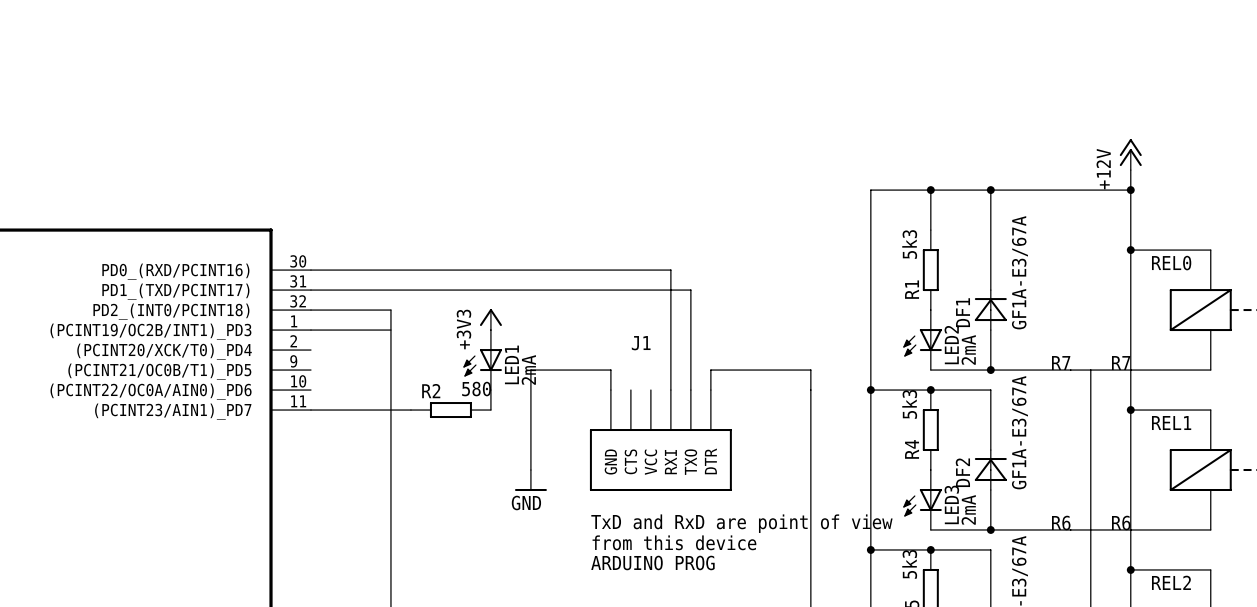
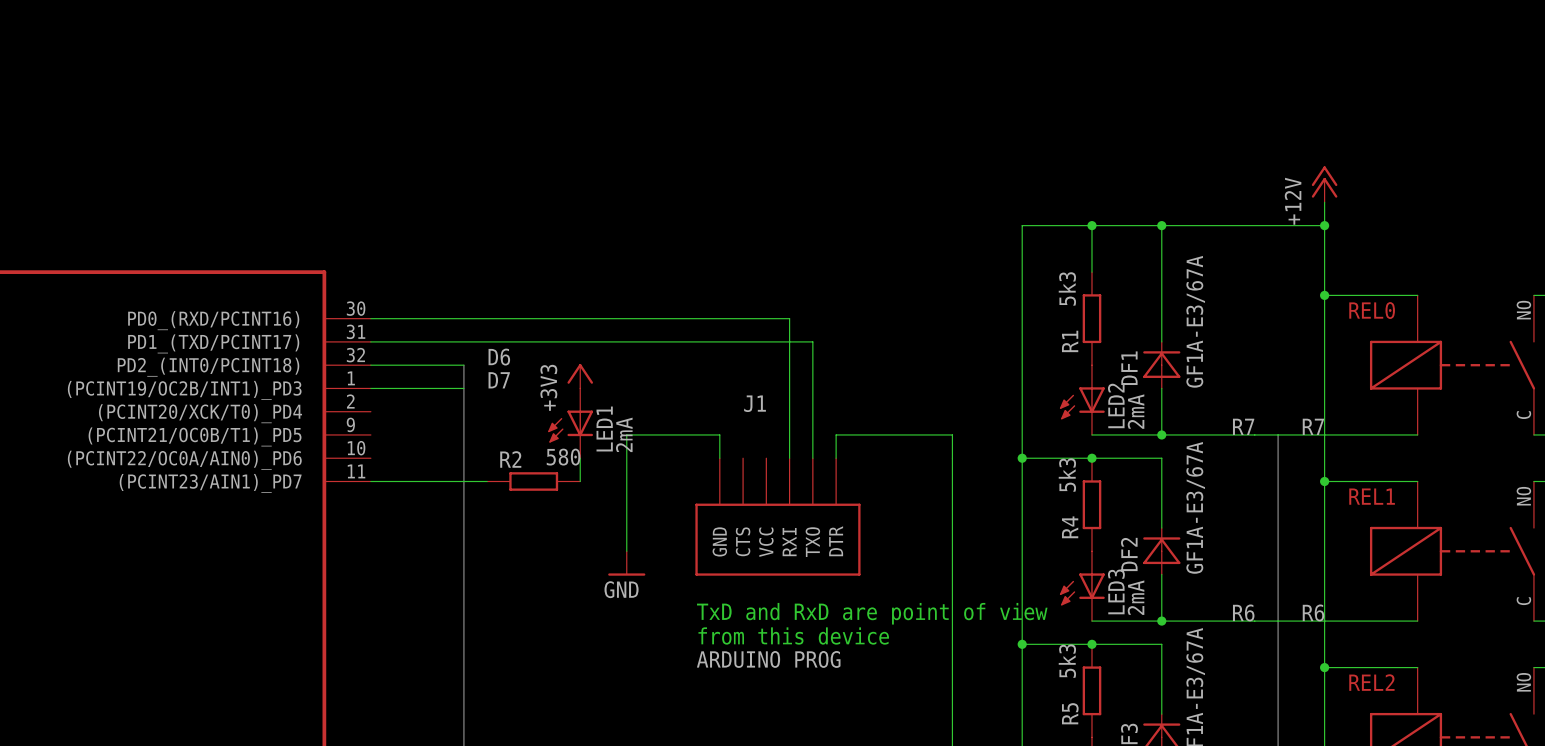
label: none -> D6 (499, 357)
label: none -> D7 (499, 380)

